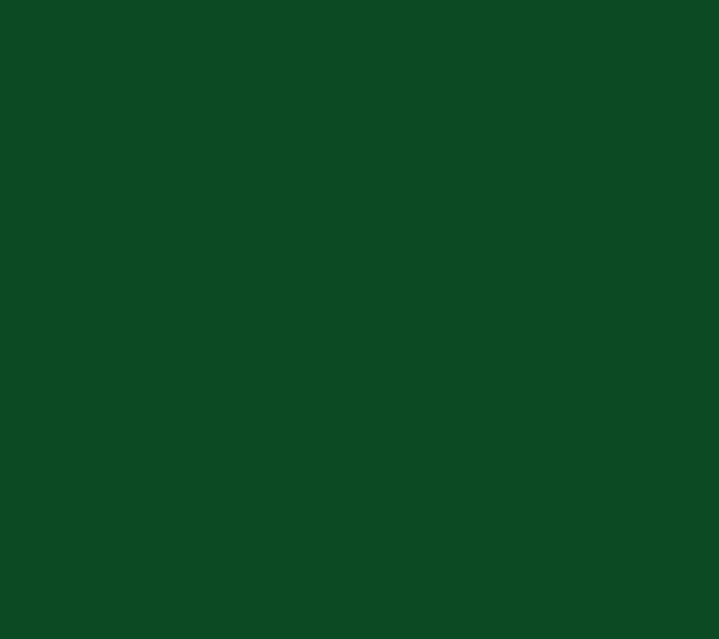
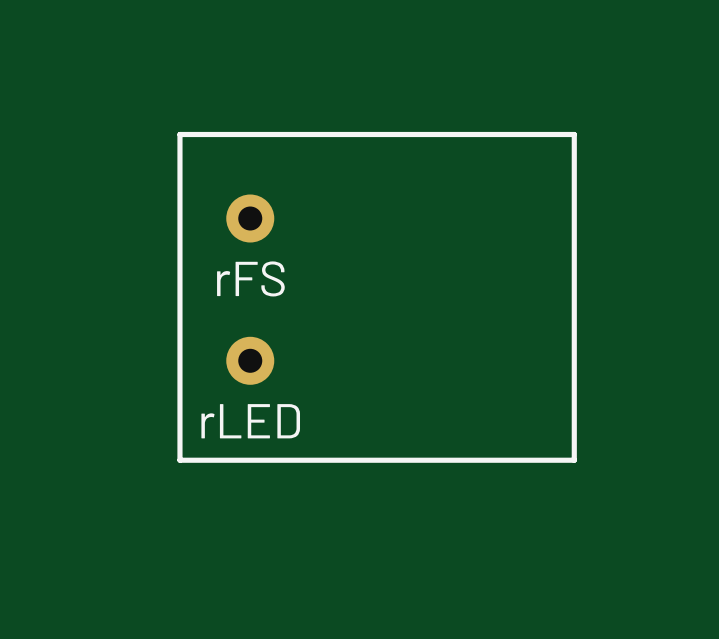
line: none -> (574, 134) (179, 134) (179, 460) (574, 460) (574, 134)
part: none -> (250, 218)
part: none -> (250, 360)

